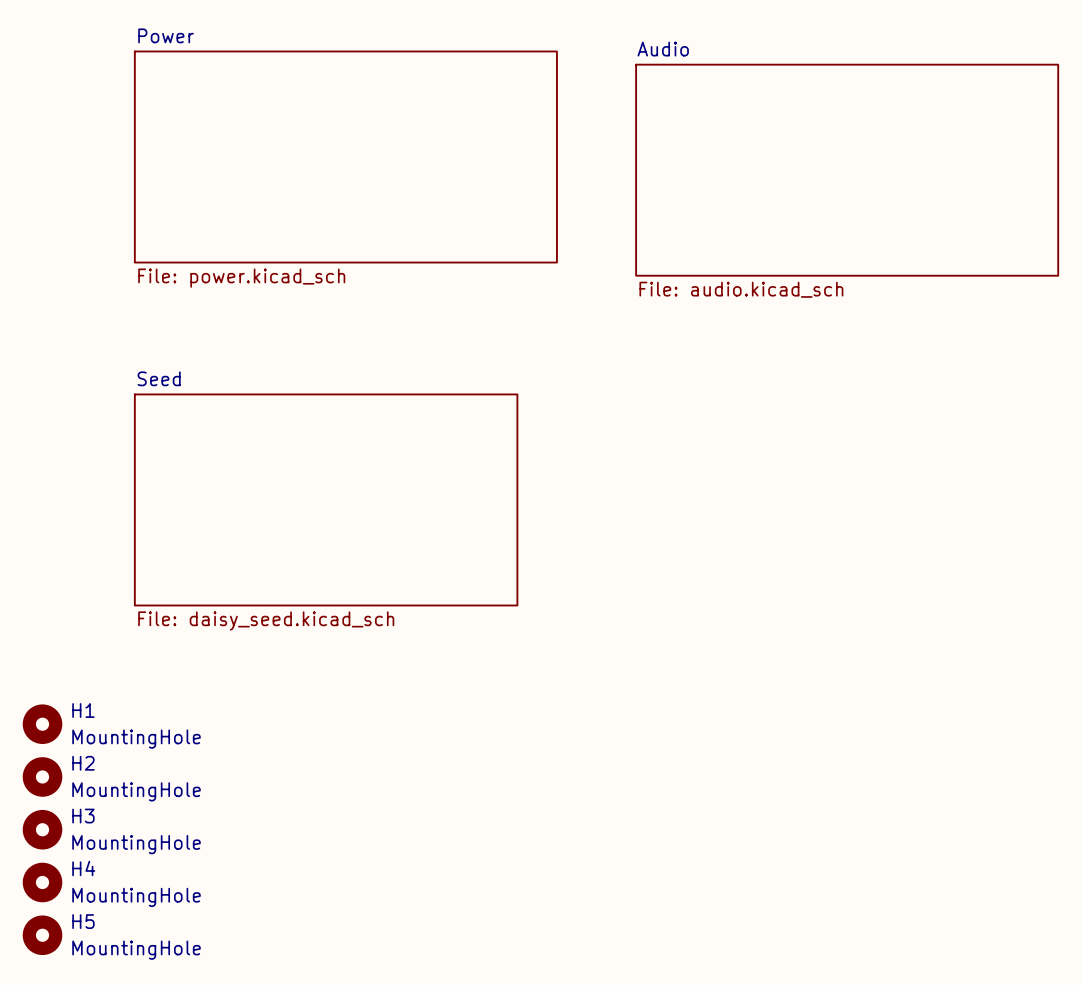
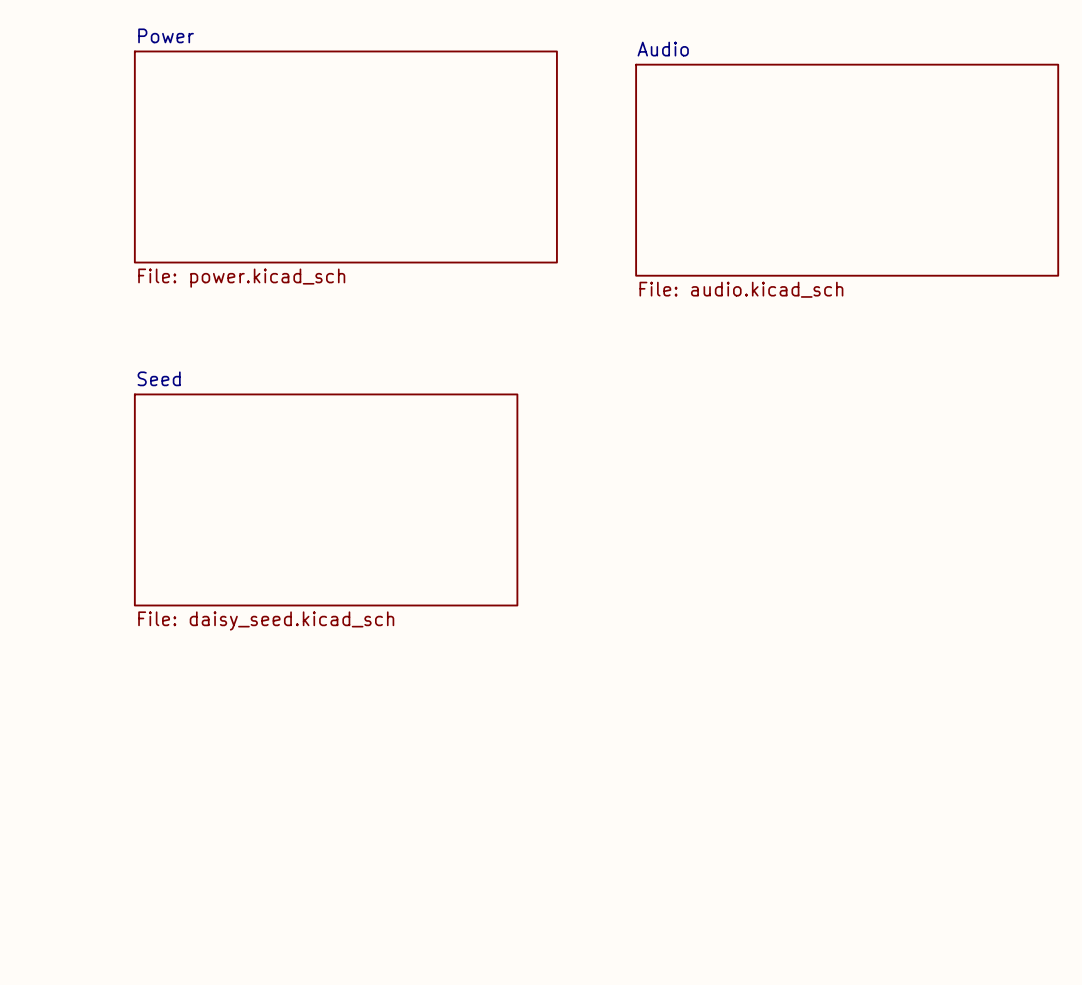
H1: MountingHole (42, 724) -> none
H2: MountingHole (42, 776) -> none
H3: MountingHole (42, 829) -> none
H4: MountingHole (42, 882) -> none
H5: MountingHole (42, 935) -> none

